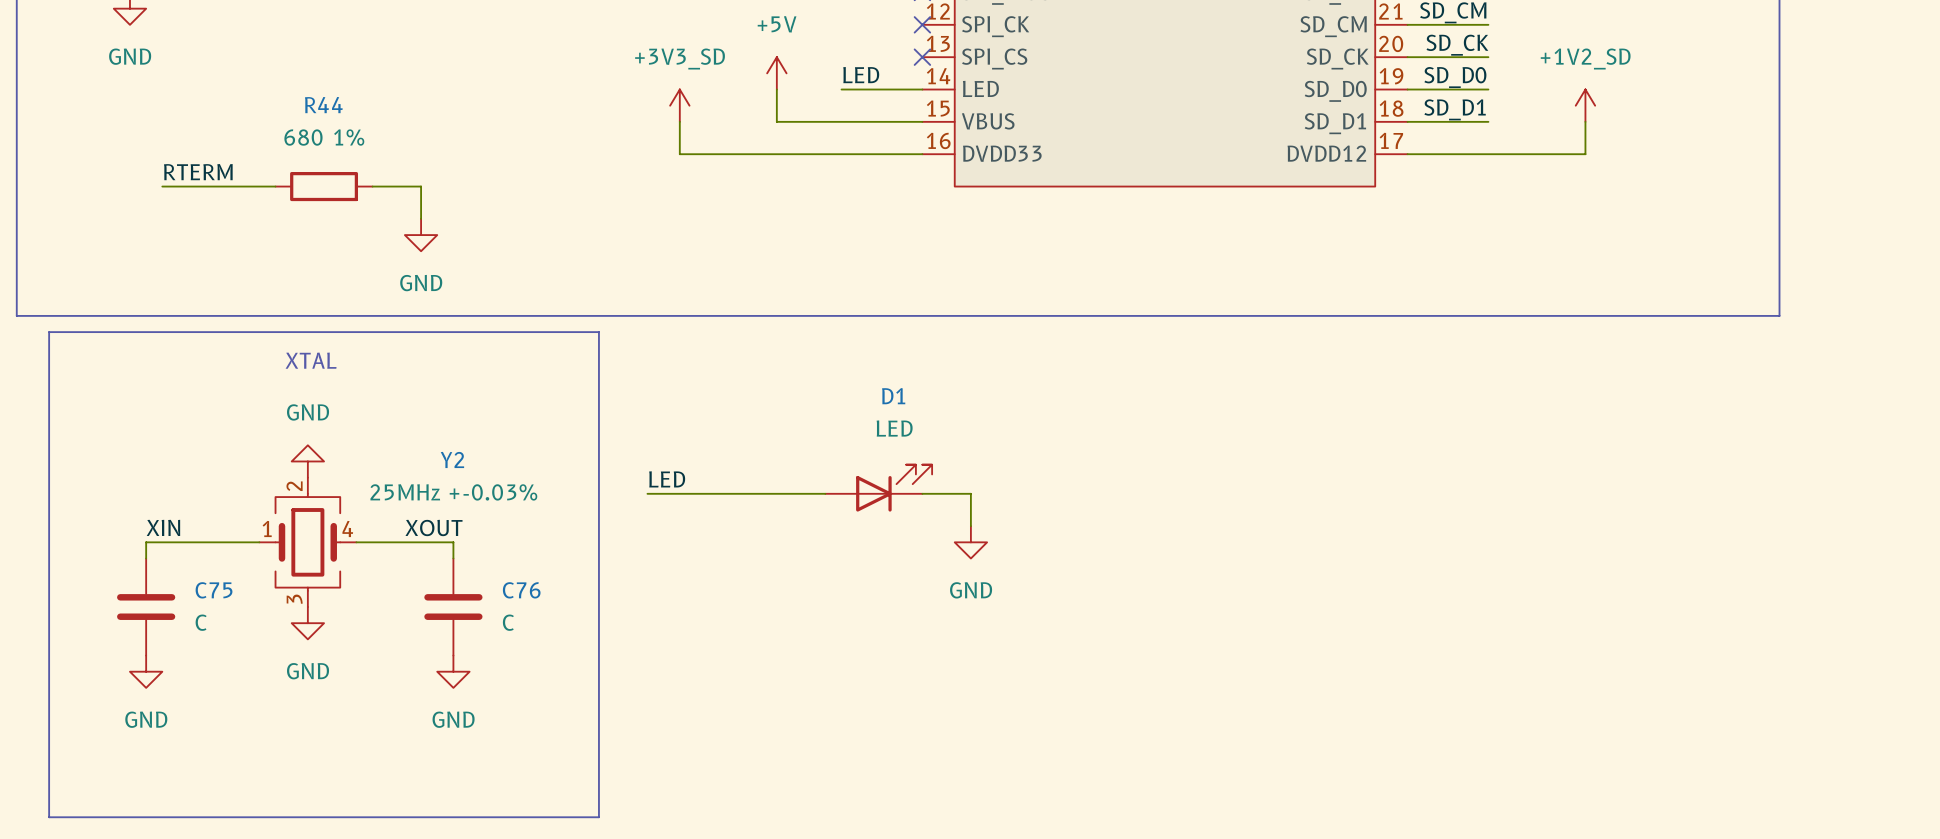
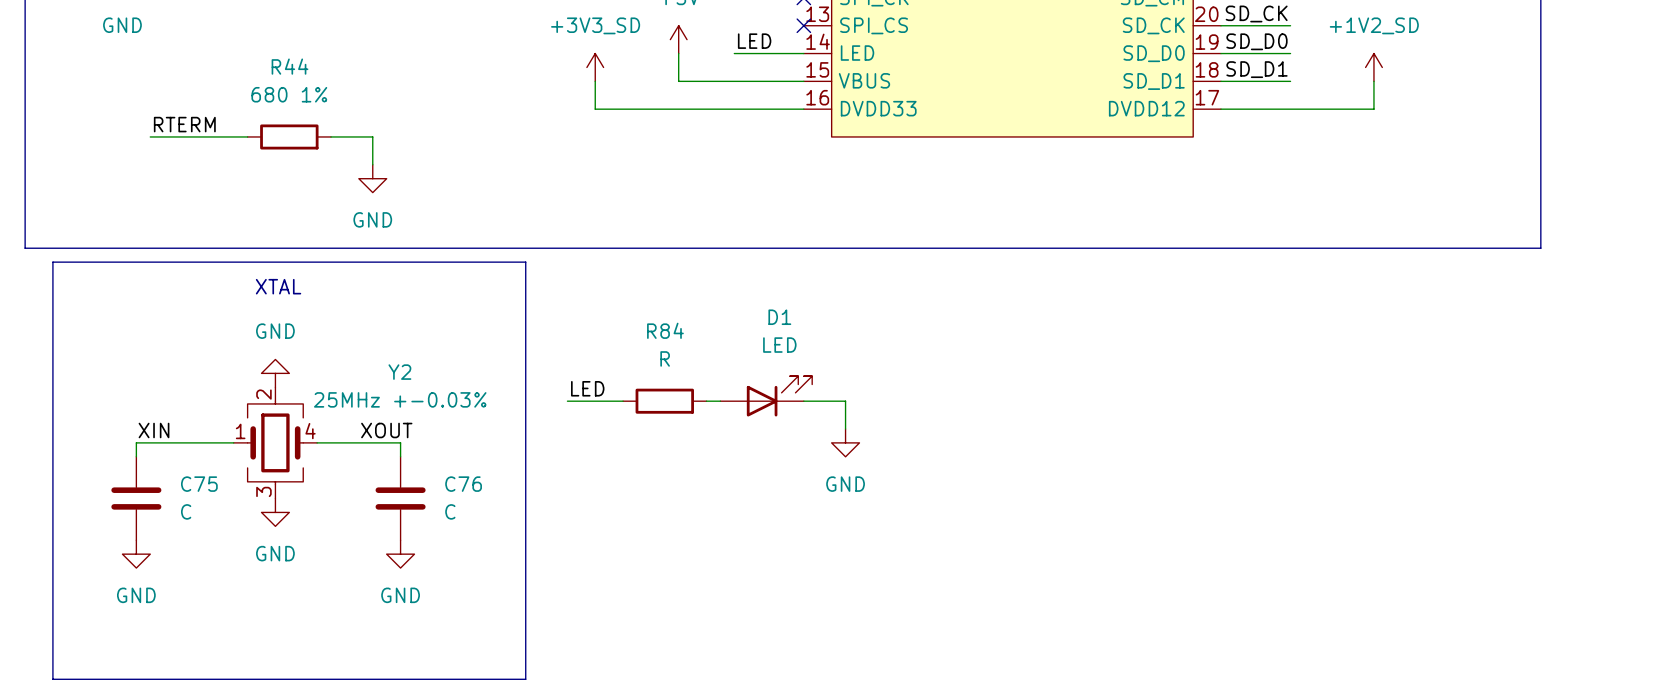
wire: (712, 493) (809, 493) -> none
R84: none -> R (664, 401)

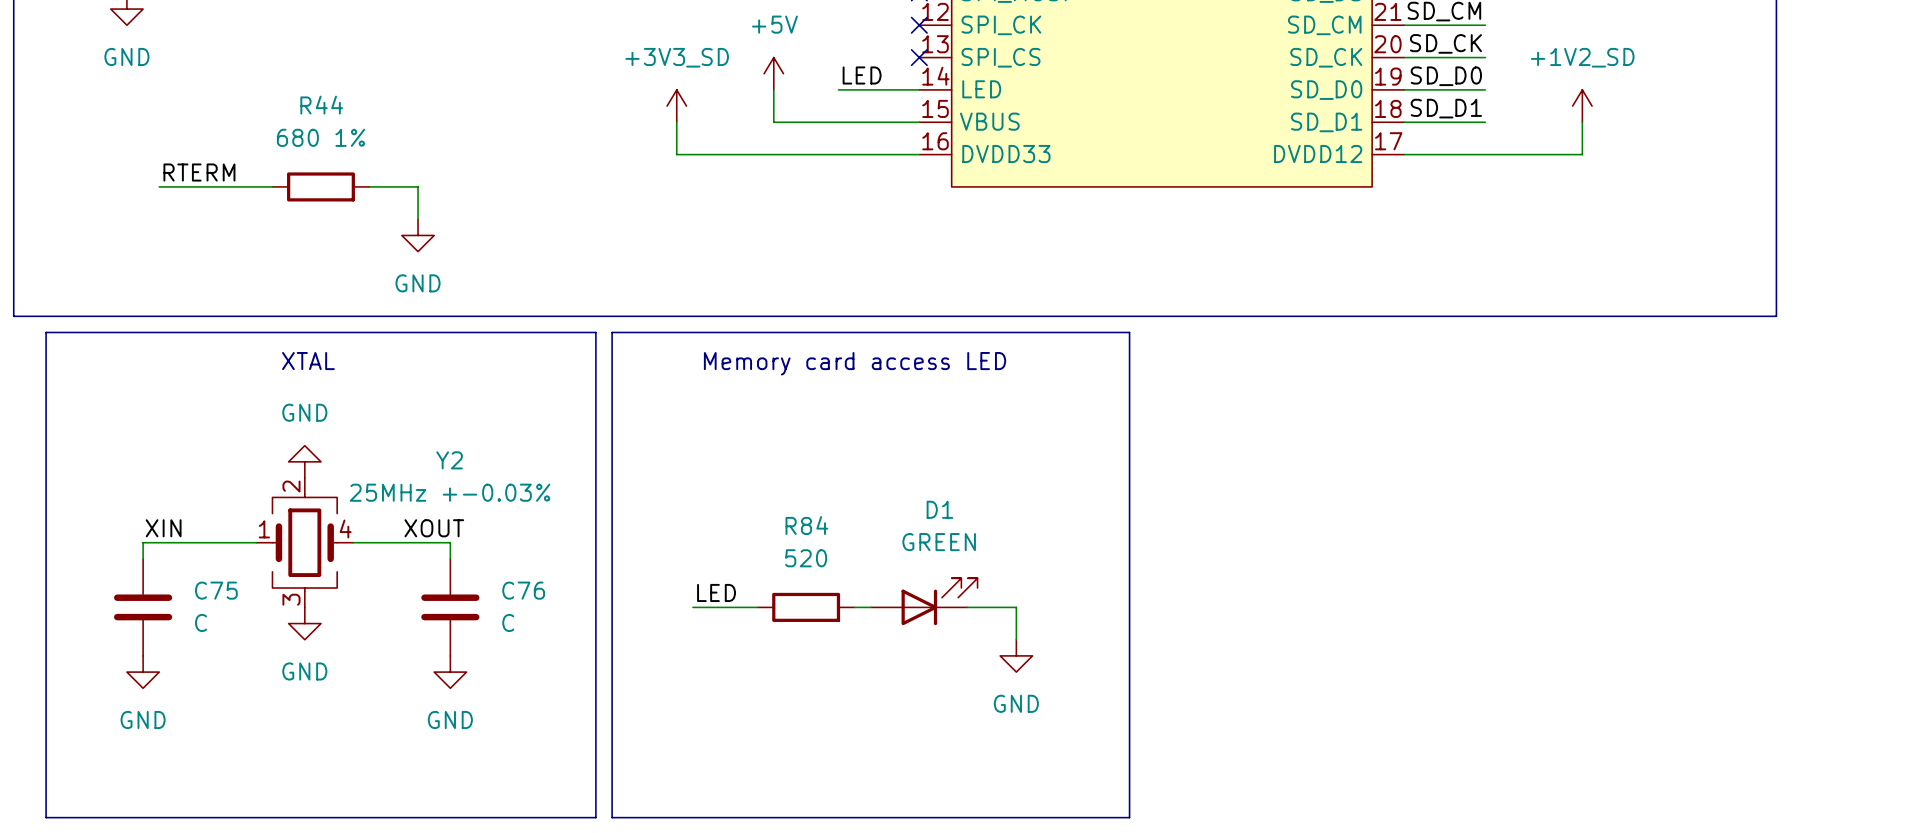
line: none -> (612, 332) (1129, 332) (1129, 817) (612, 817) (612, 332)
text: none -> Memory card access LED (855, 363)
D1 value: LED (779, 345) -> GREEN (939, 542)
R84 value: R (665, 358) -> 520 (806, 558)
label position: LED (587, 388) -> LED (716, 592)
D1 position: (766, 396) -> (924, 601)
wire: (567, 401) (623, 401) -> (692, 607) (757, 607)
R84 position: (664, 401) -> (806, 607)
wire: (706, 401) (720, 401) -> (854, 607) (870, 607)
wire: (803, 401) (845, 401) (845, 429) -> (967, 607) (1016, 607) (1016, 639)
power symbol position: GND (845, 442) -> GND (1016, 655)

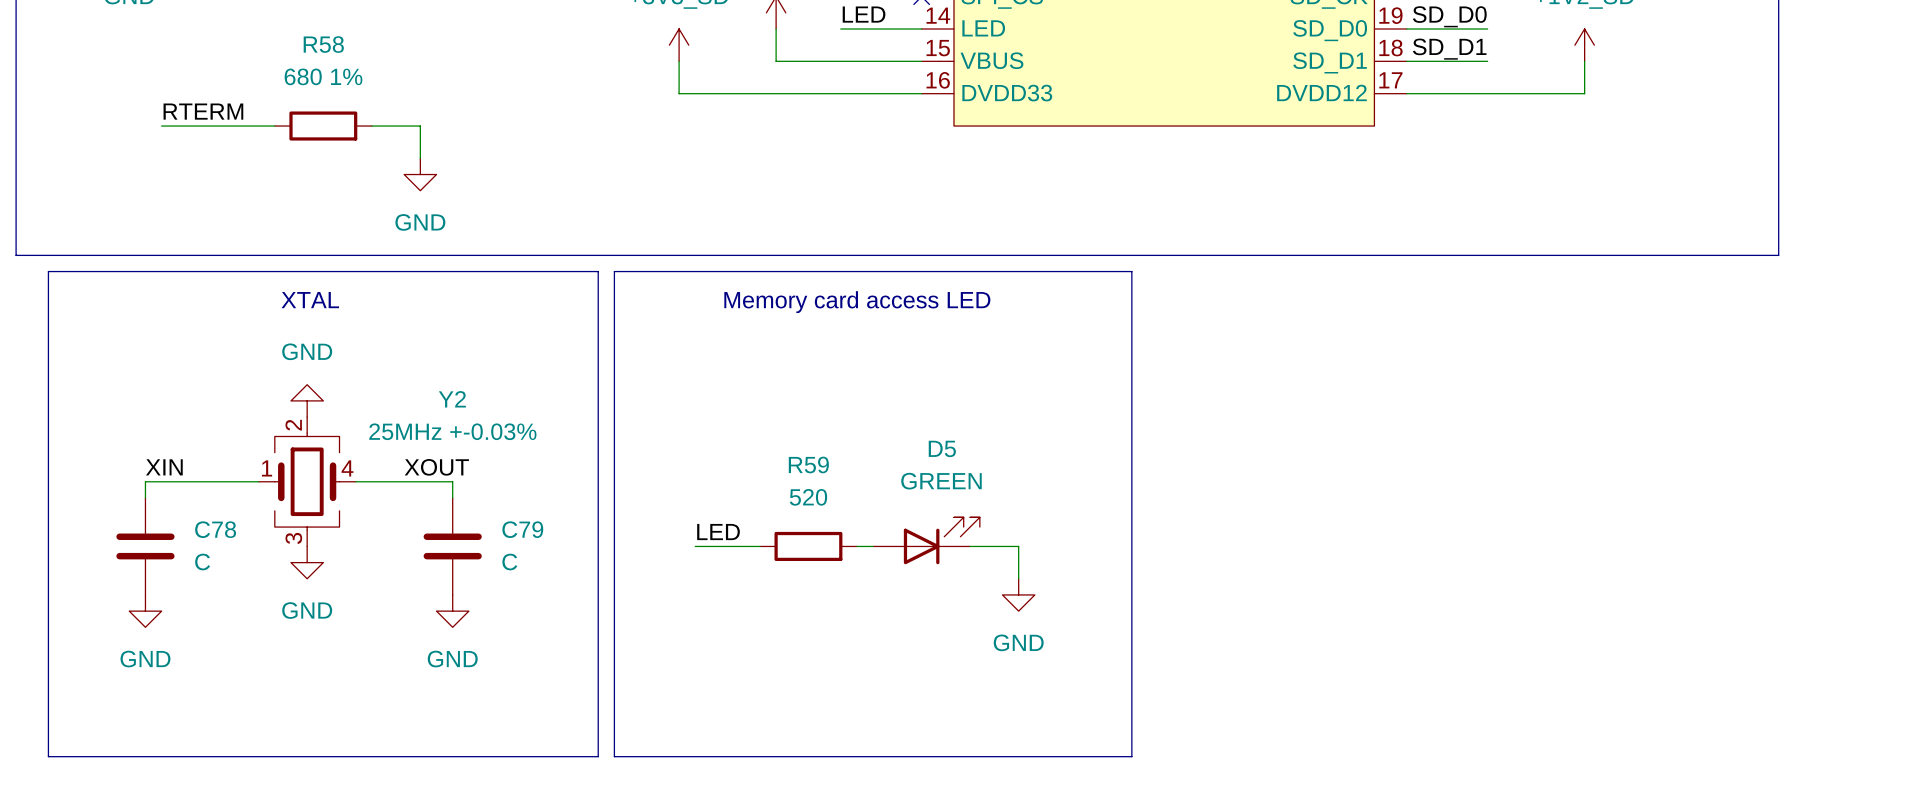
R44 name: R44 (321, 105) -> R58 (323, 44)
D1 name: D1 (939, 509) -> D5 (942, 448)
R84 name: R84 (806, 525) -> R59 (808, 464)
C75 name: C75 (216, 590) -> C78 (215, 529)
C76 name: C76 (523, 590) -> C79 (522, 529)

